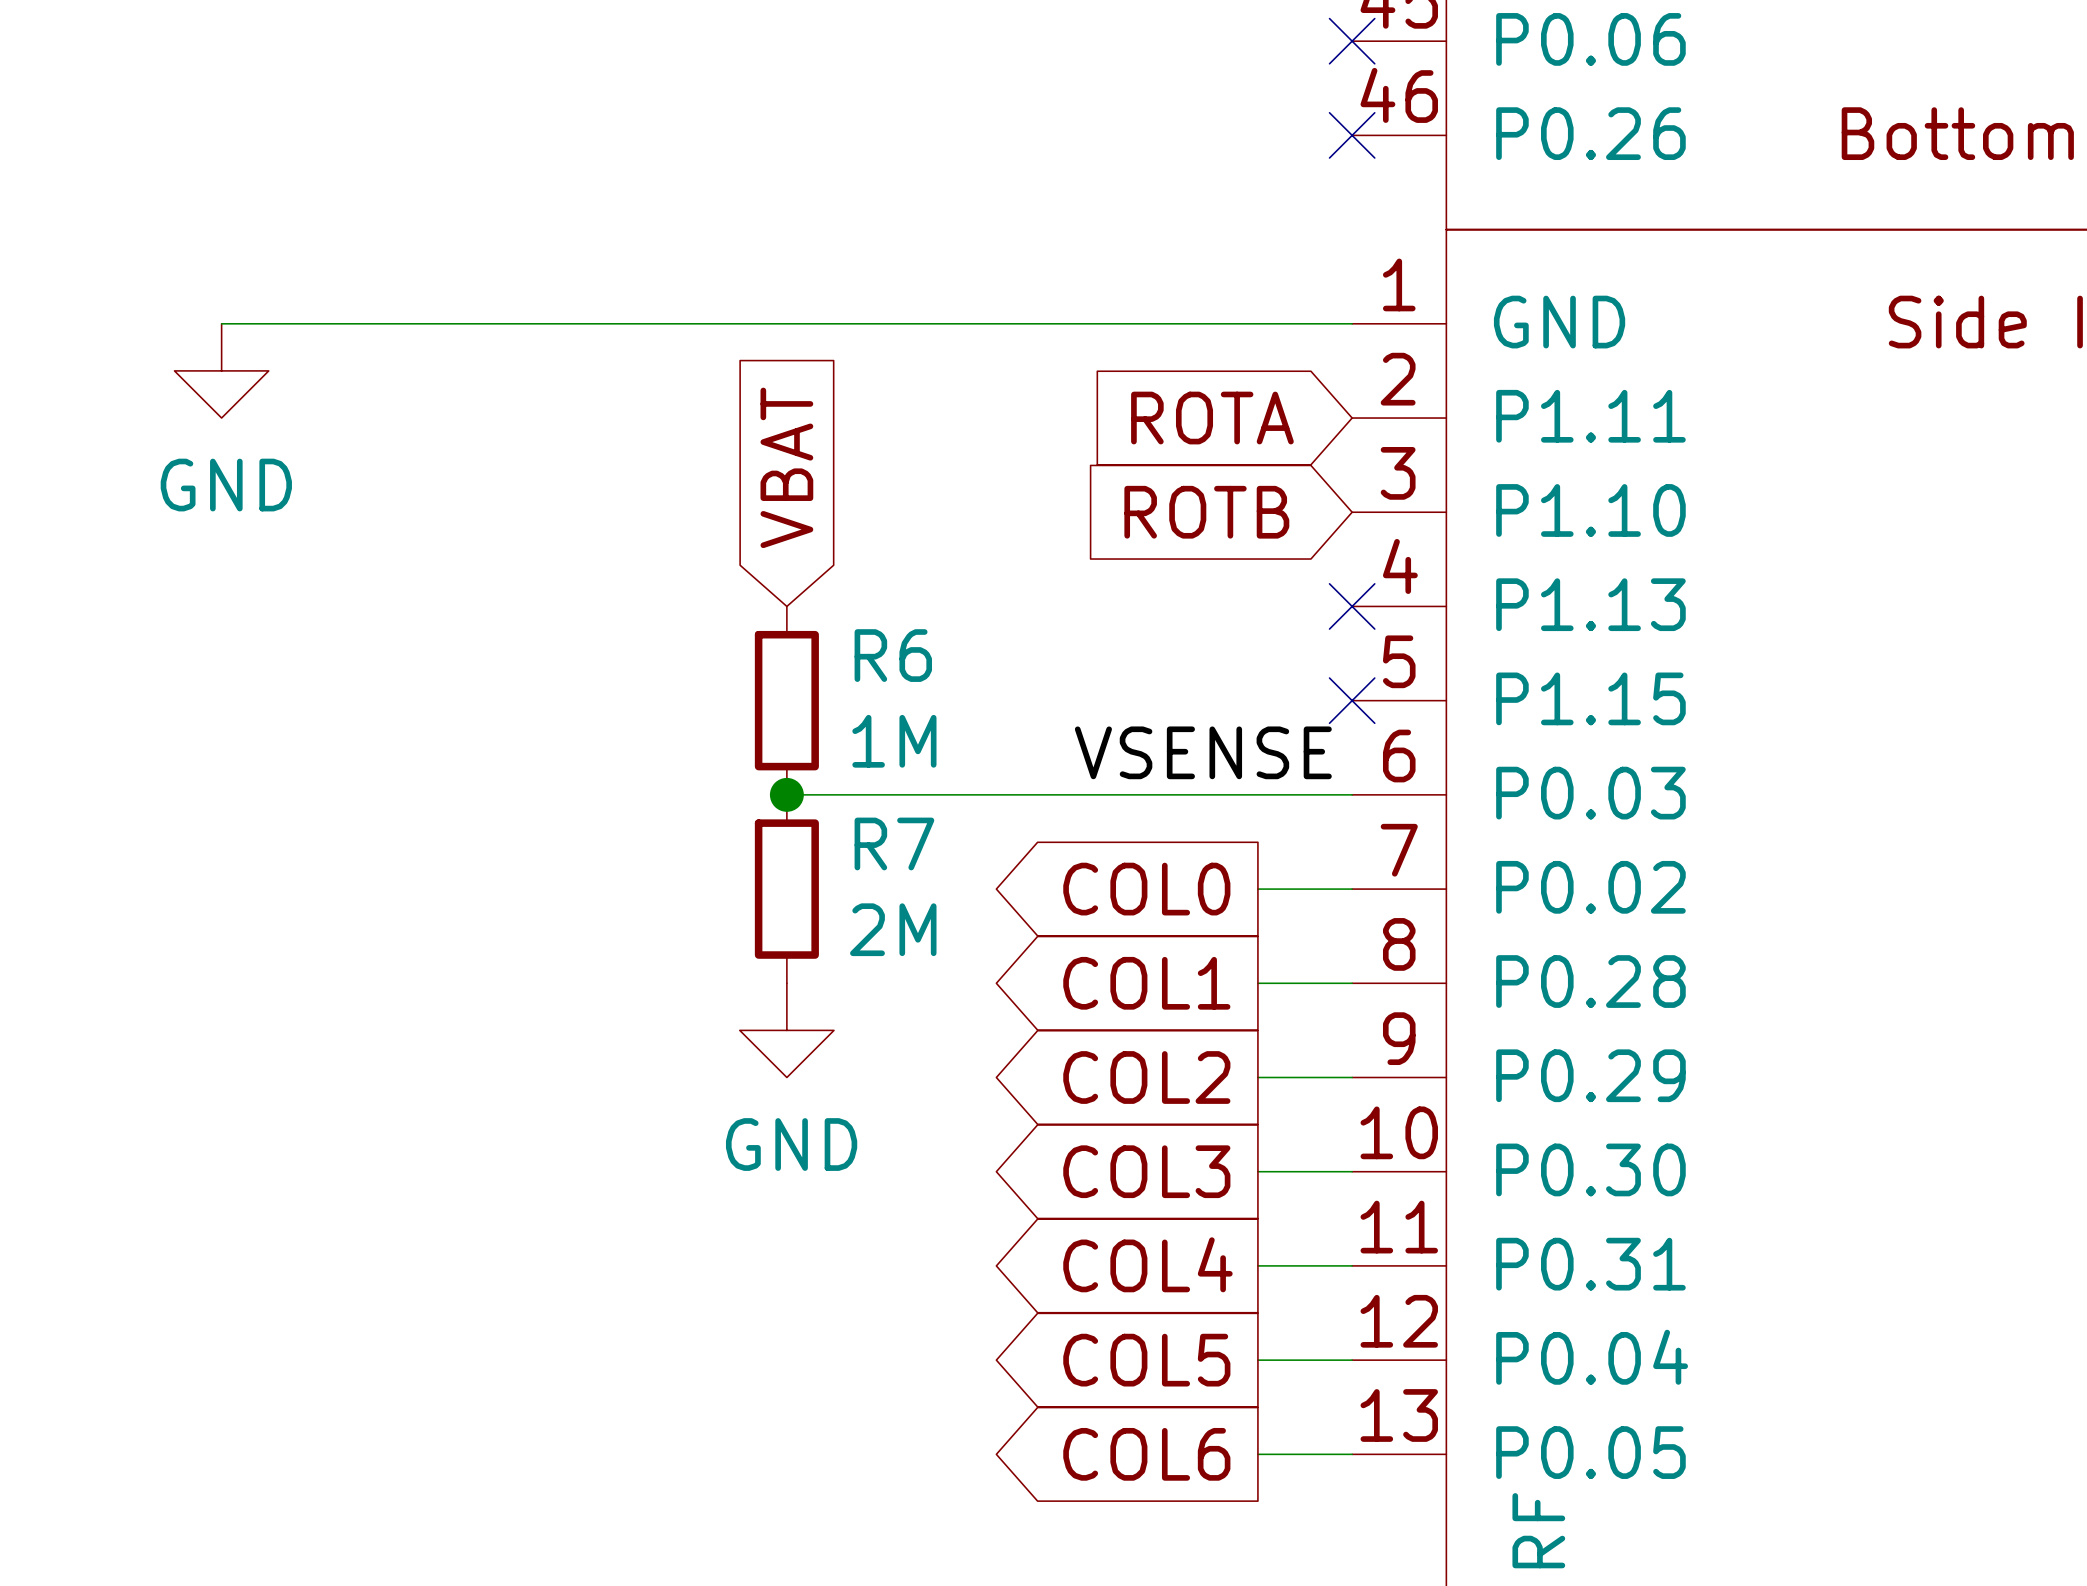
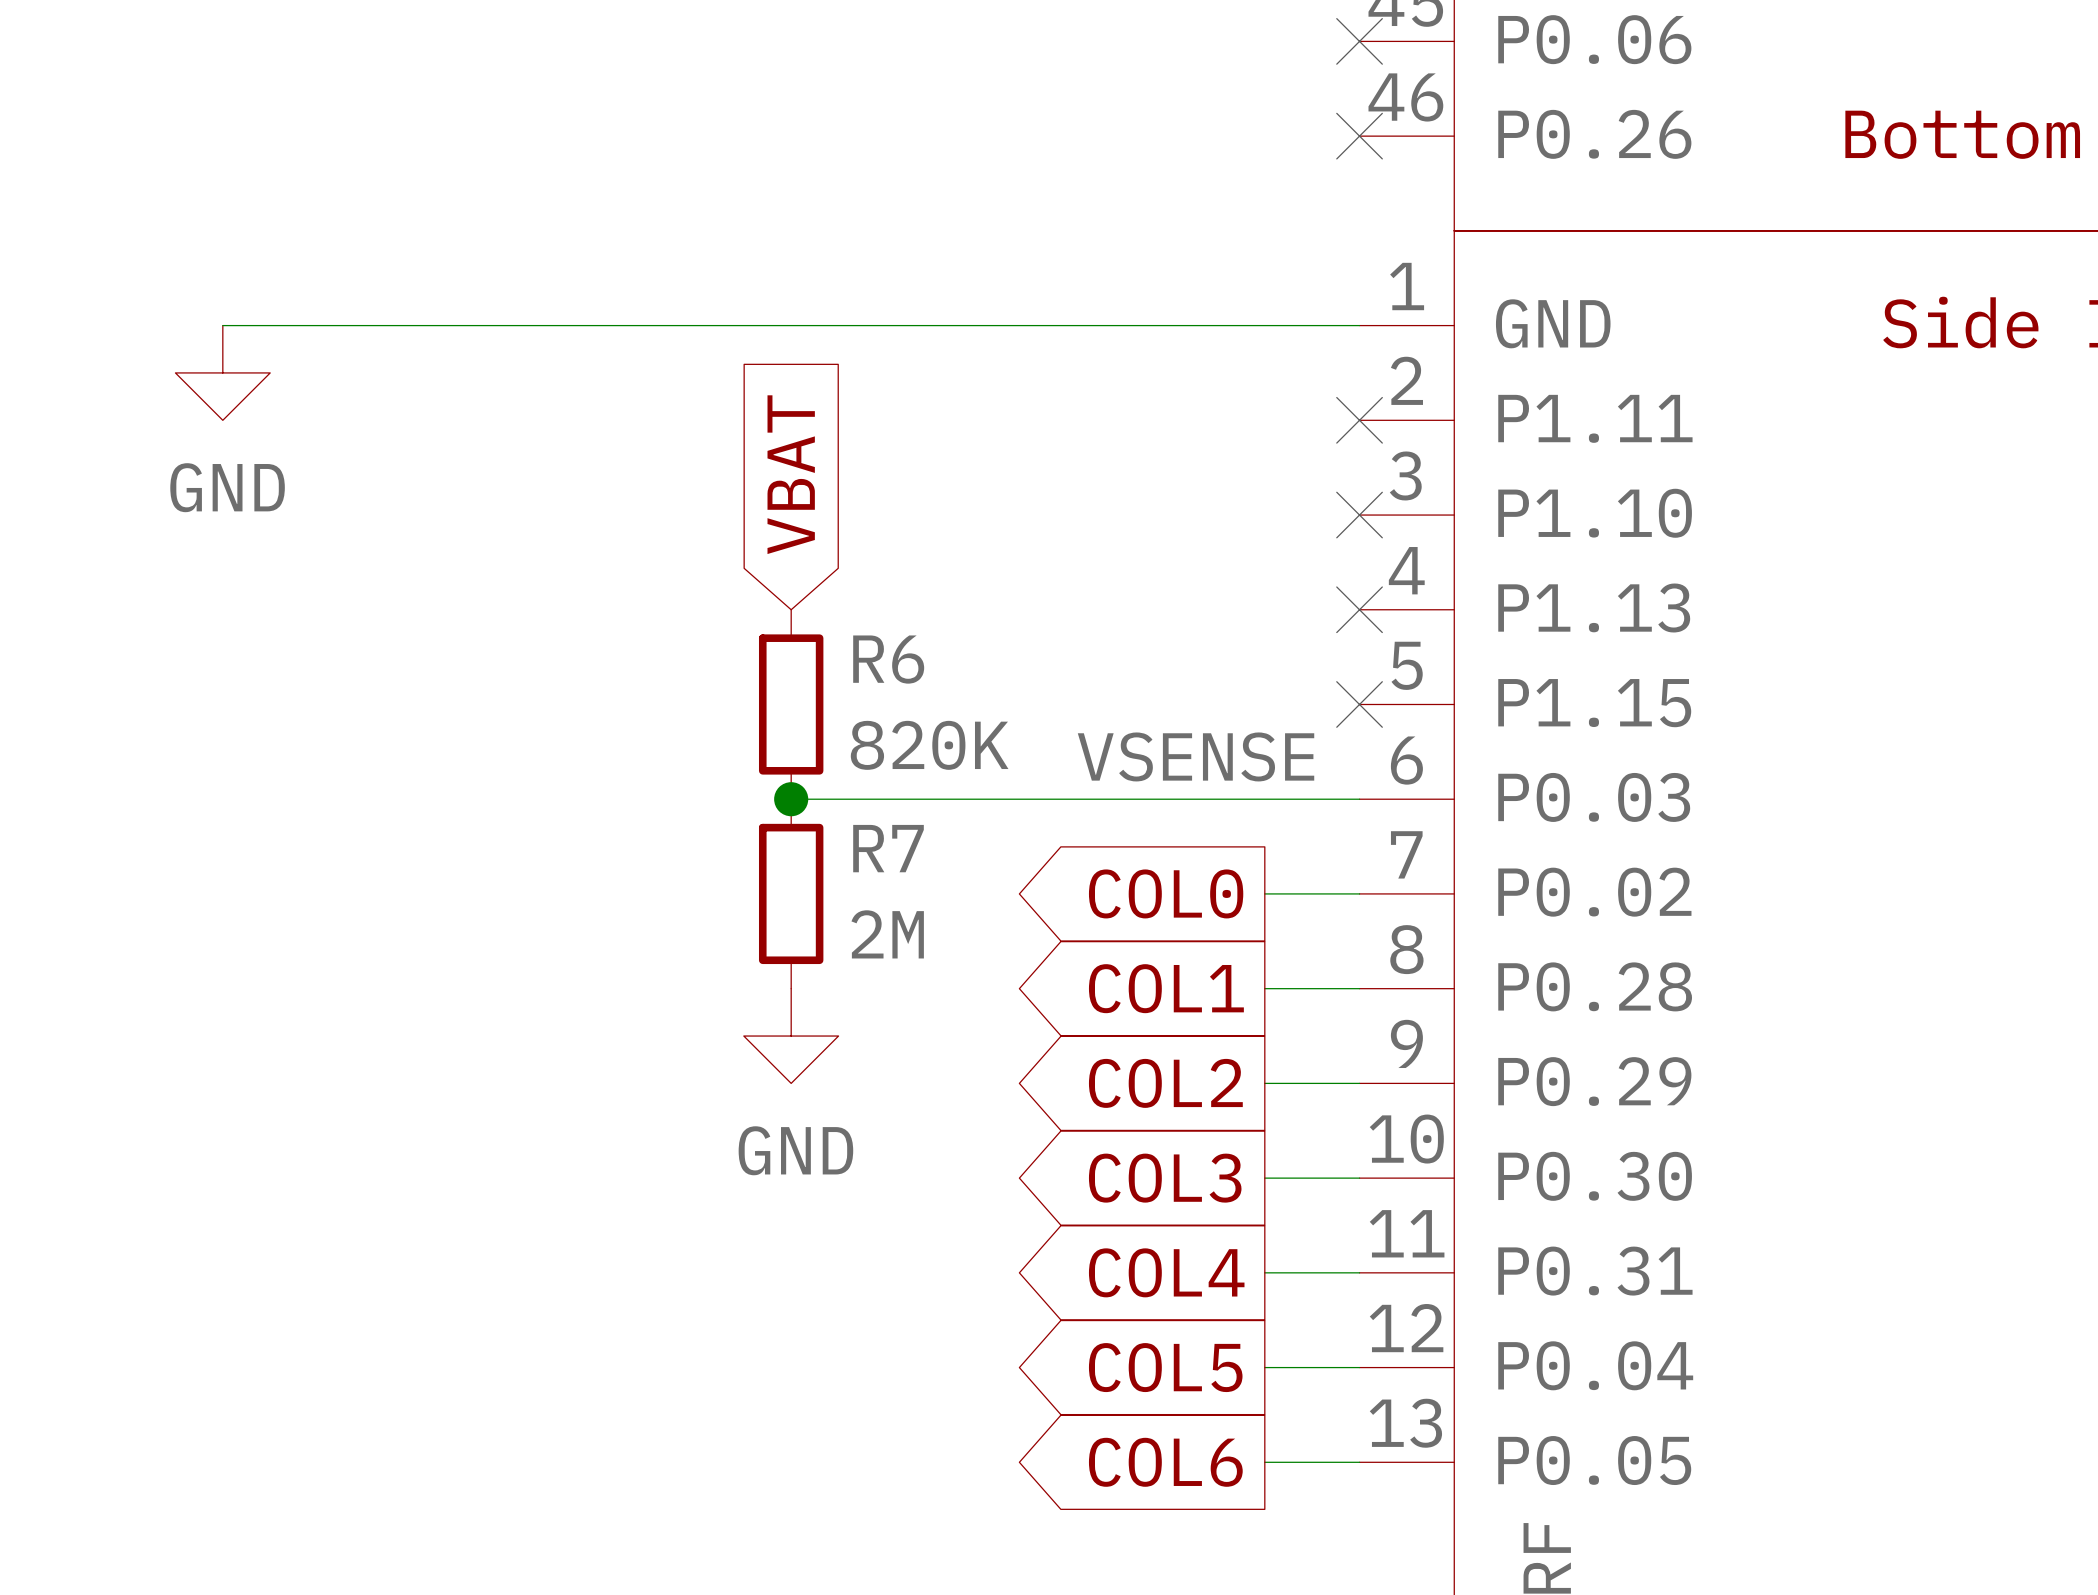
global label: ROTA (1212, 418) -> none
no-connect mark: none -> (1359, 420)
global label: ROTB (1206, 512) -> none
no-connect mark: none -> (1359, 515)
R6 value: 1M (894, 741) -> 820K (929, 745)

